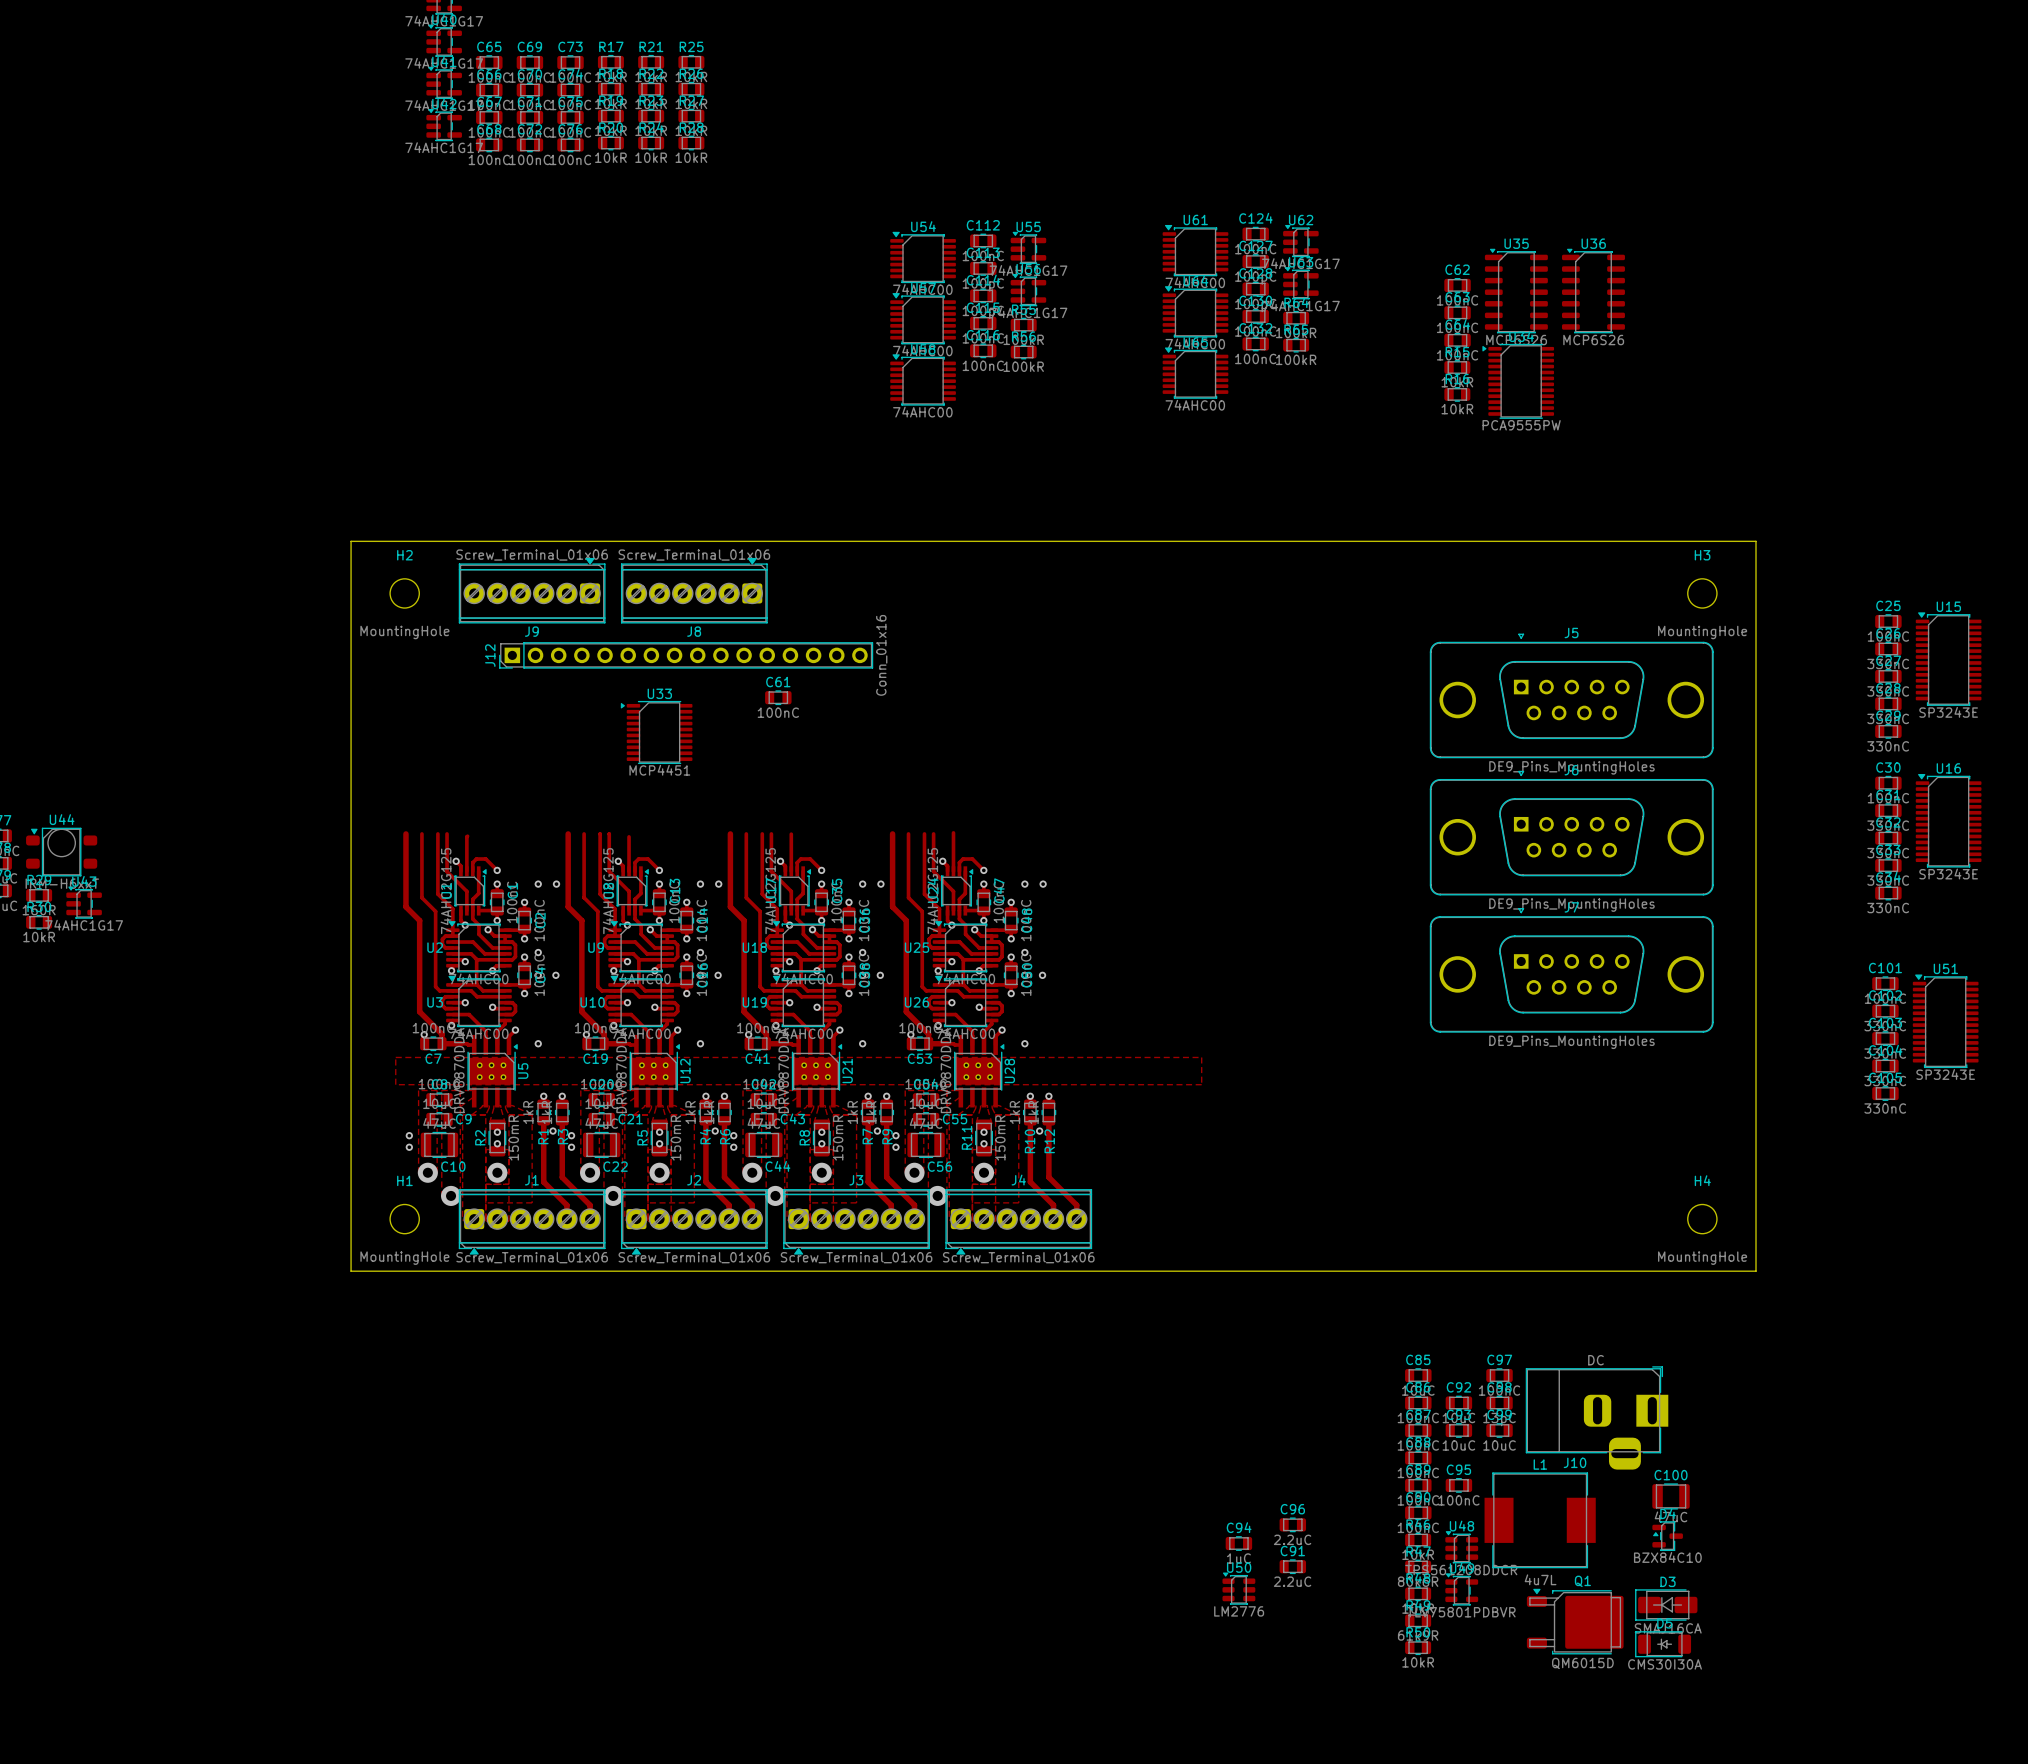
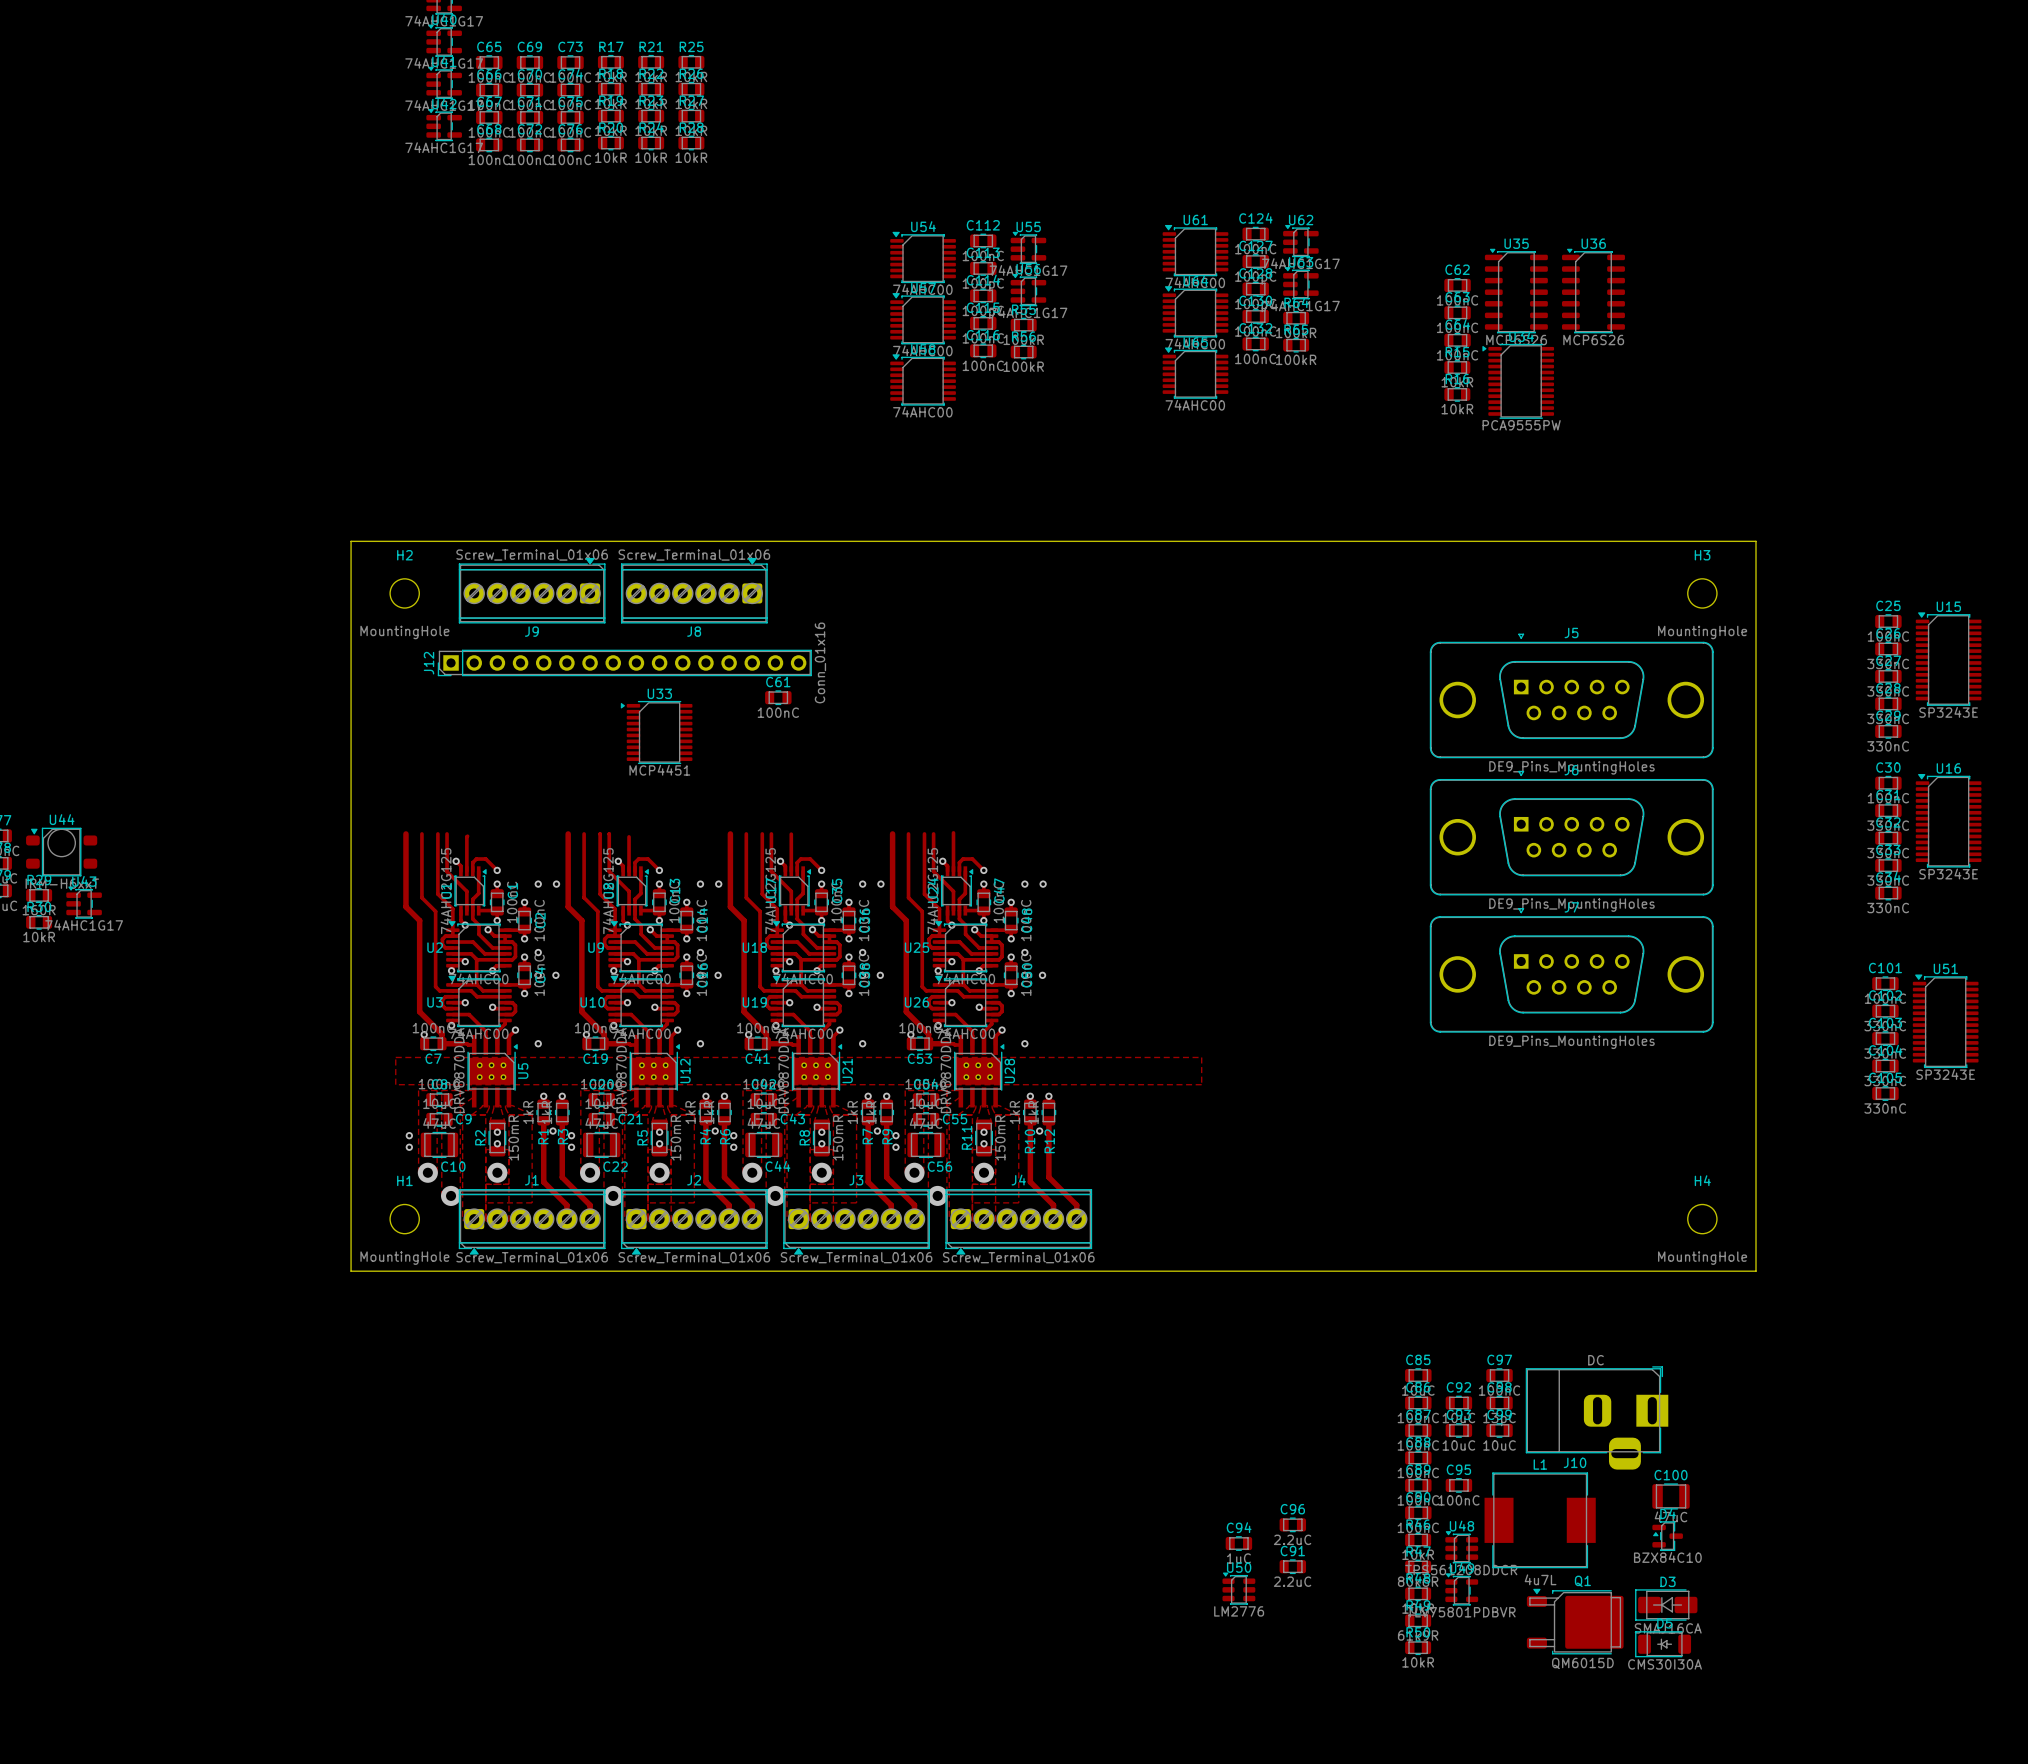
J12 position: (686, 655) -> (624, 662)

